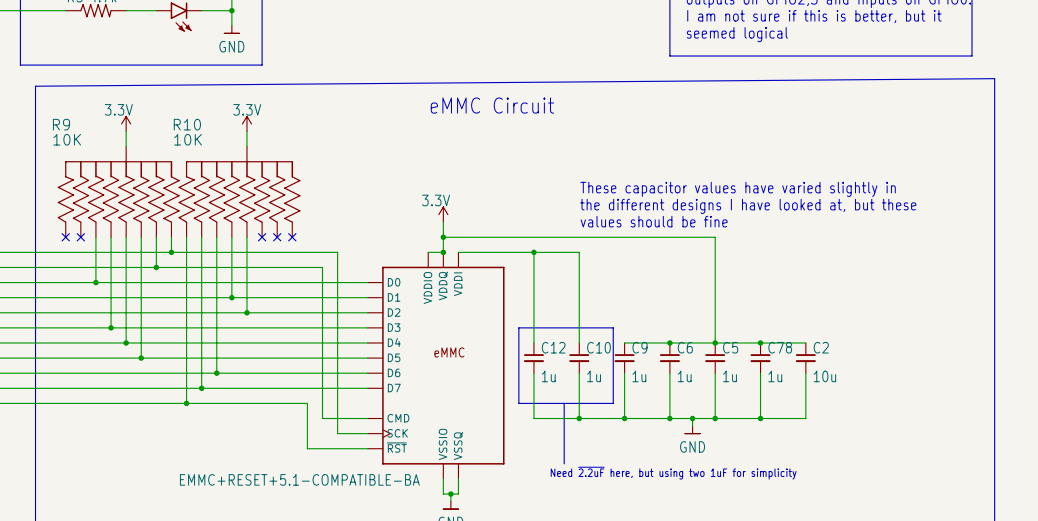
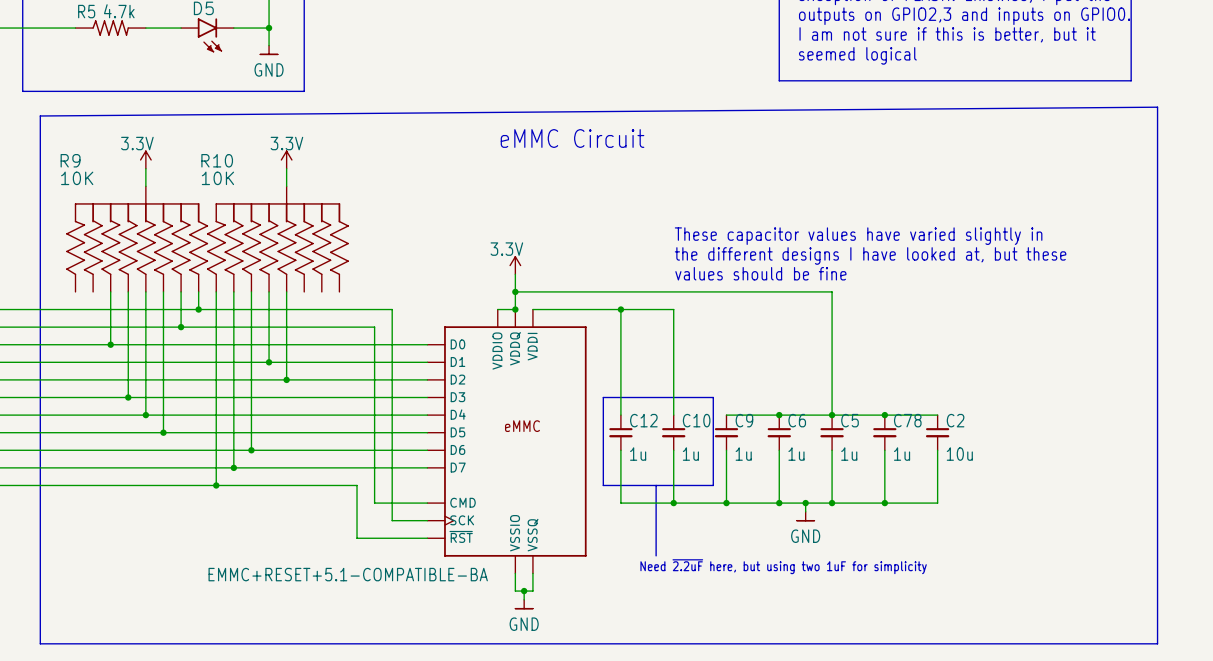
no-connect mark: (65, 237) -> none
no-connect mark: (80, 237) -> none
no-connect mark: (262, 237) -> none
no-connect mark: (277, 237) -> none
no-connect mark: (292, 237) -> none

